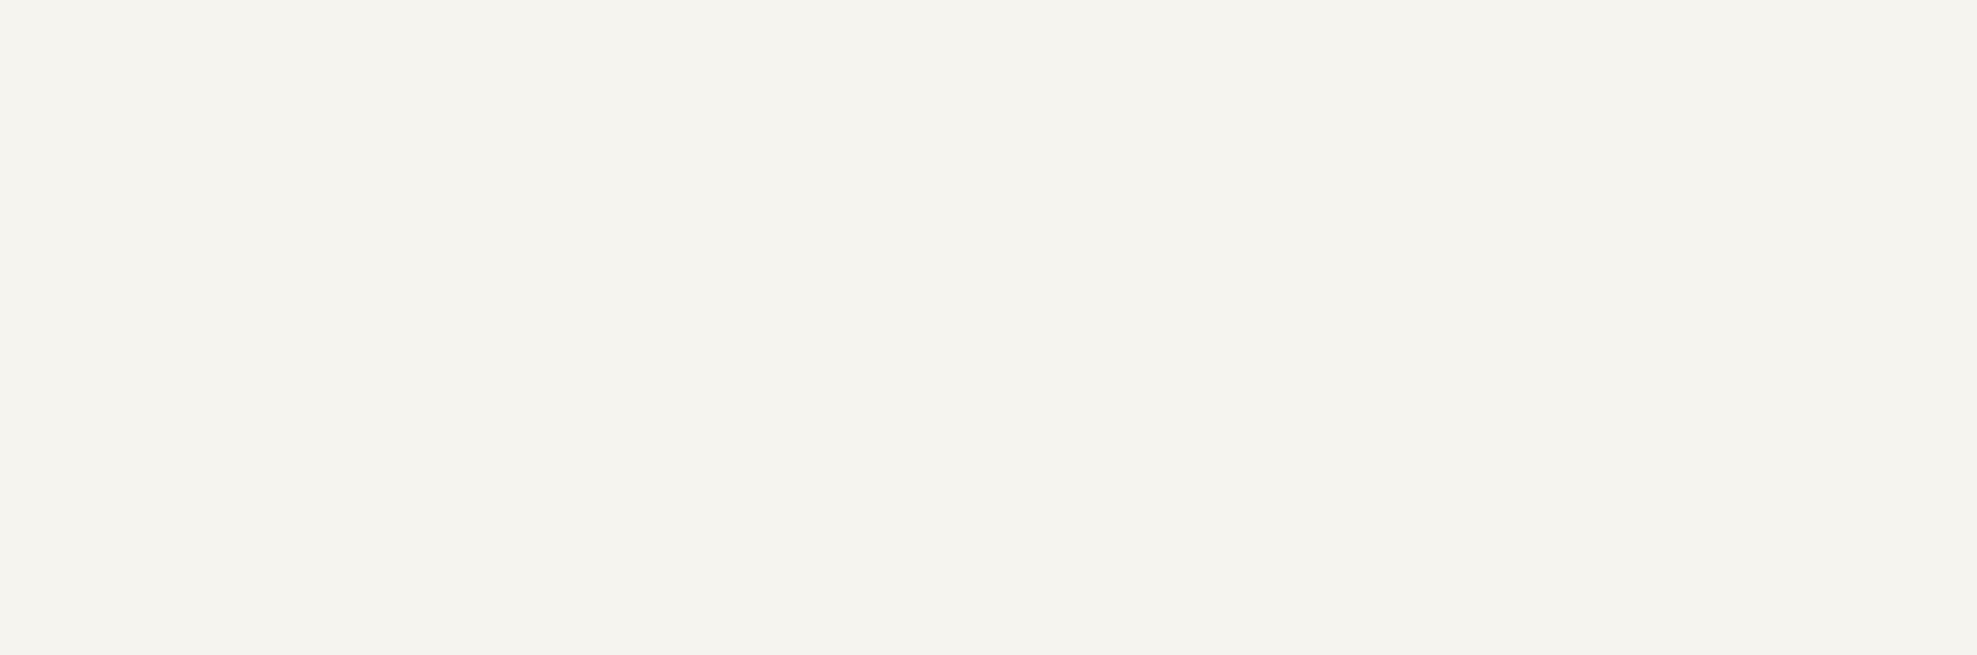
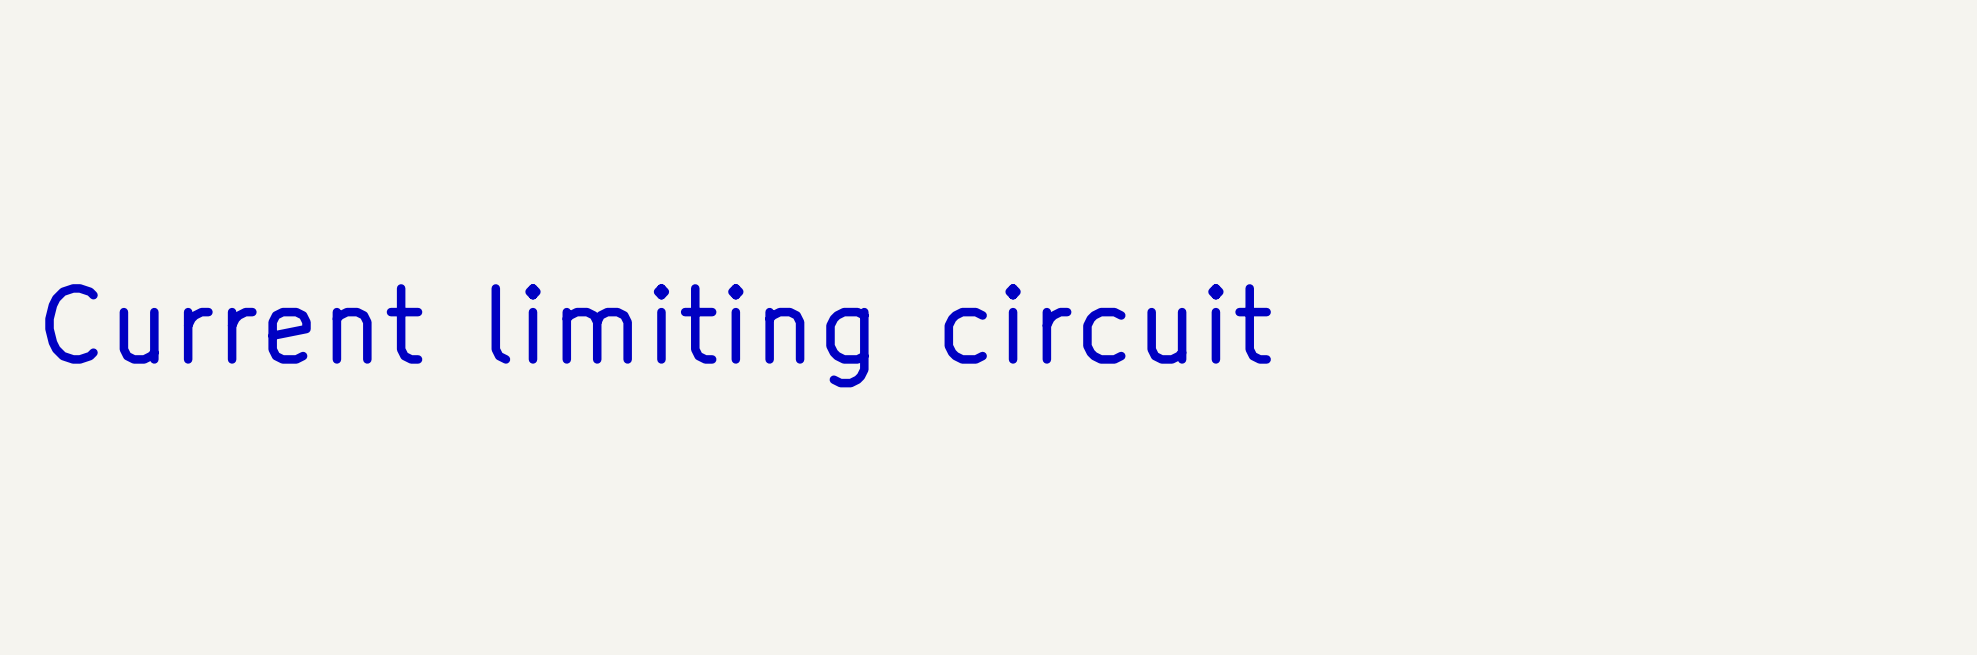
text: none -> Current limiting circuit (658, 335)

